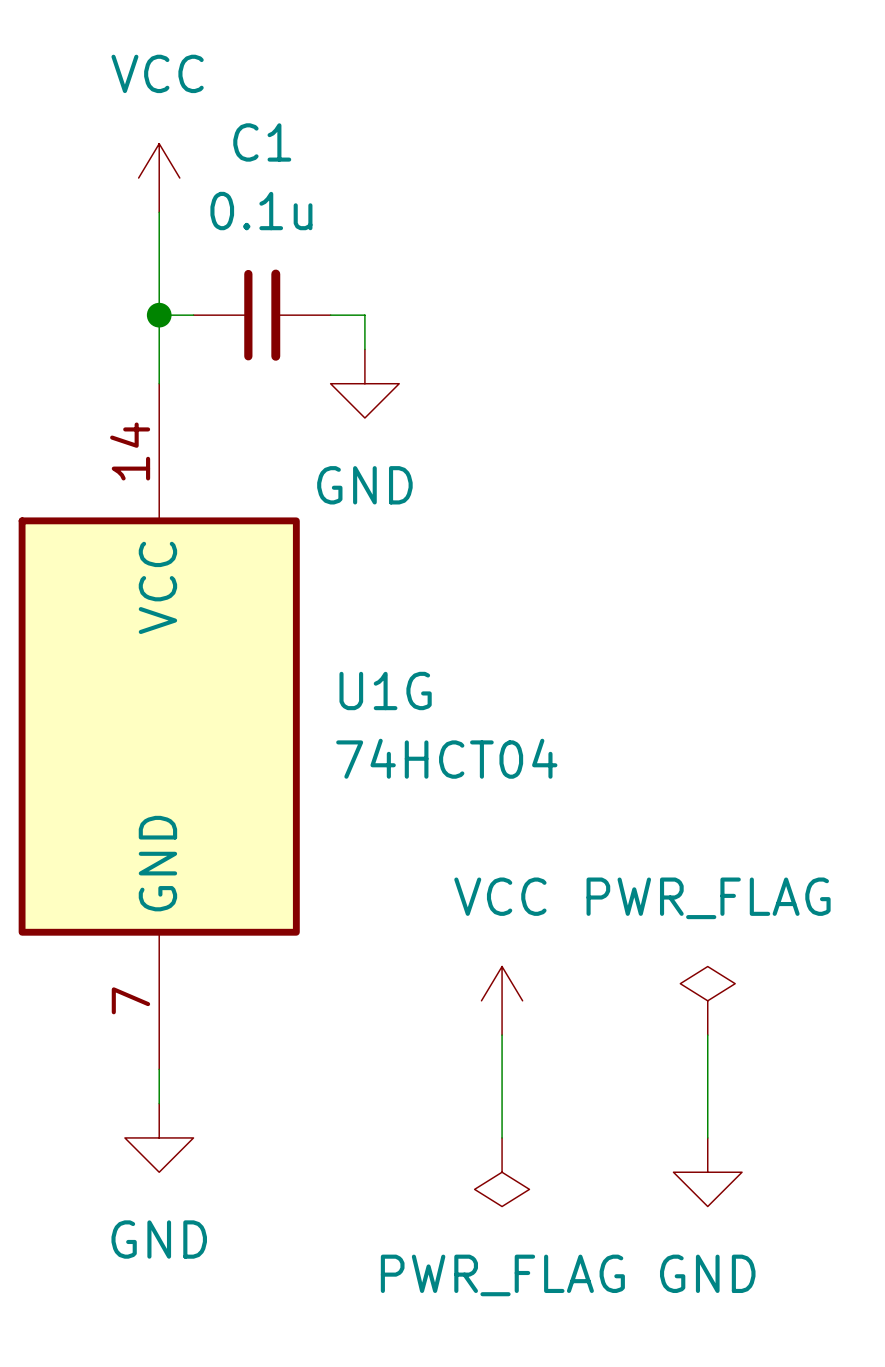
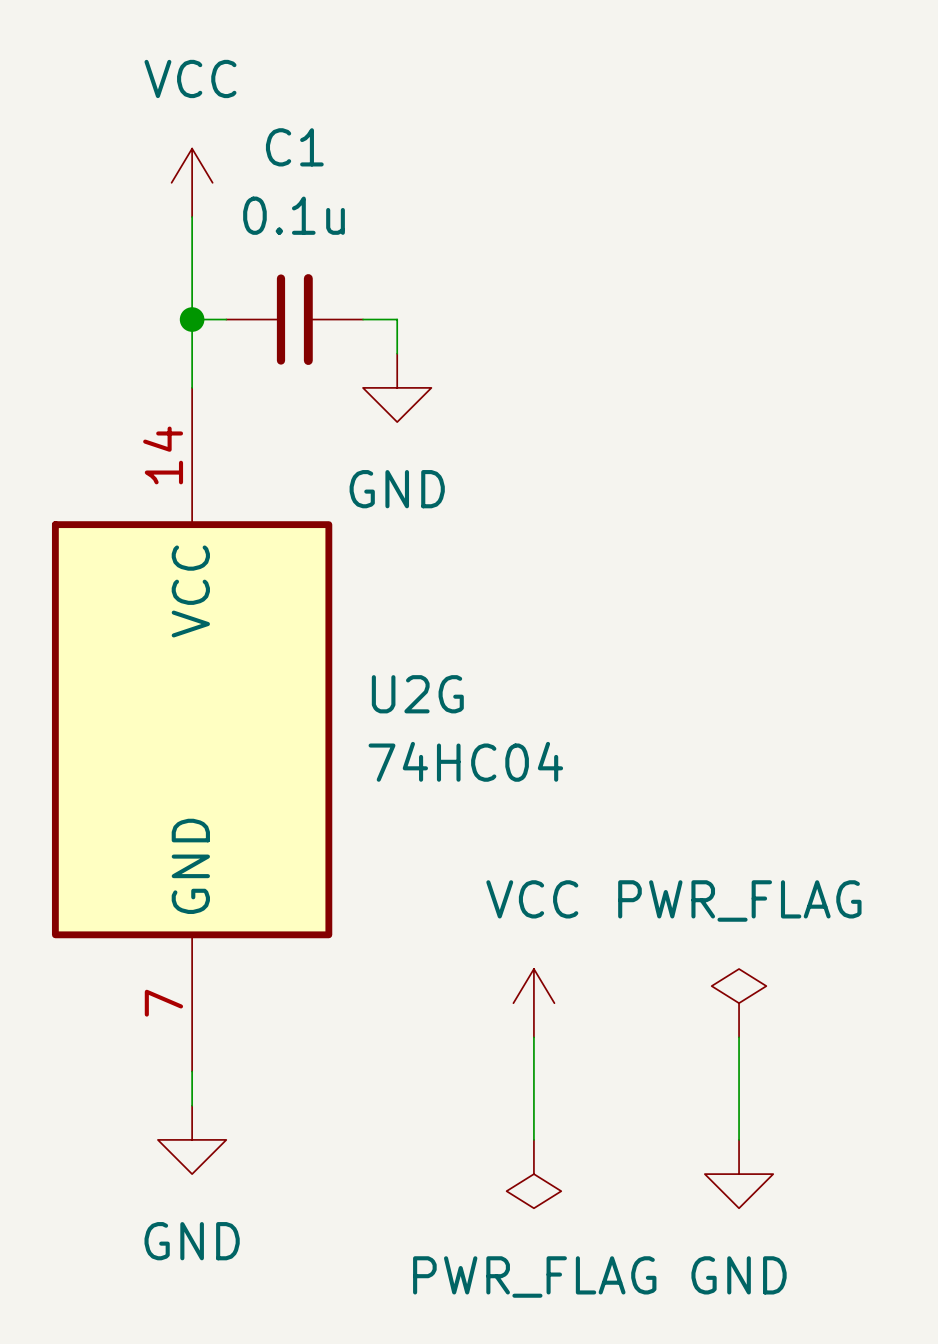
U1G name: U1G (385, 690) -> U2G (417, 694)
U1G value: 74HCT04 (446, 758) -> 74HC04 (465, 761)

